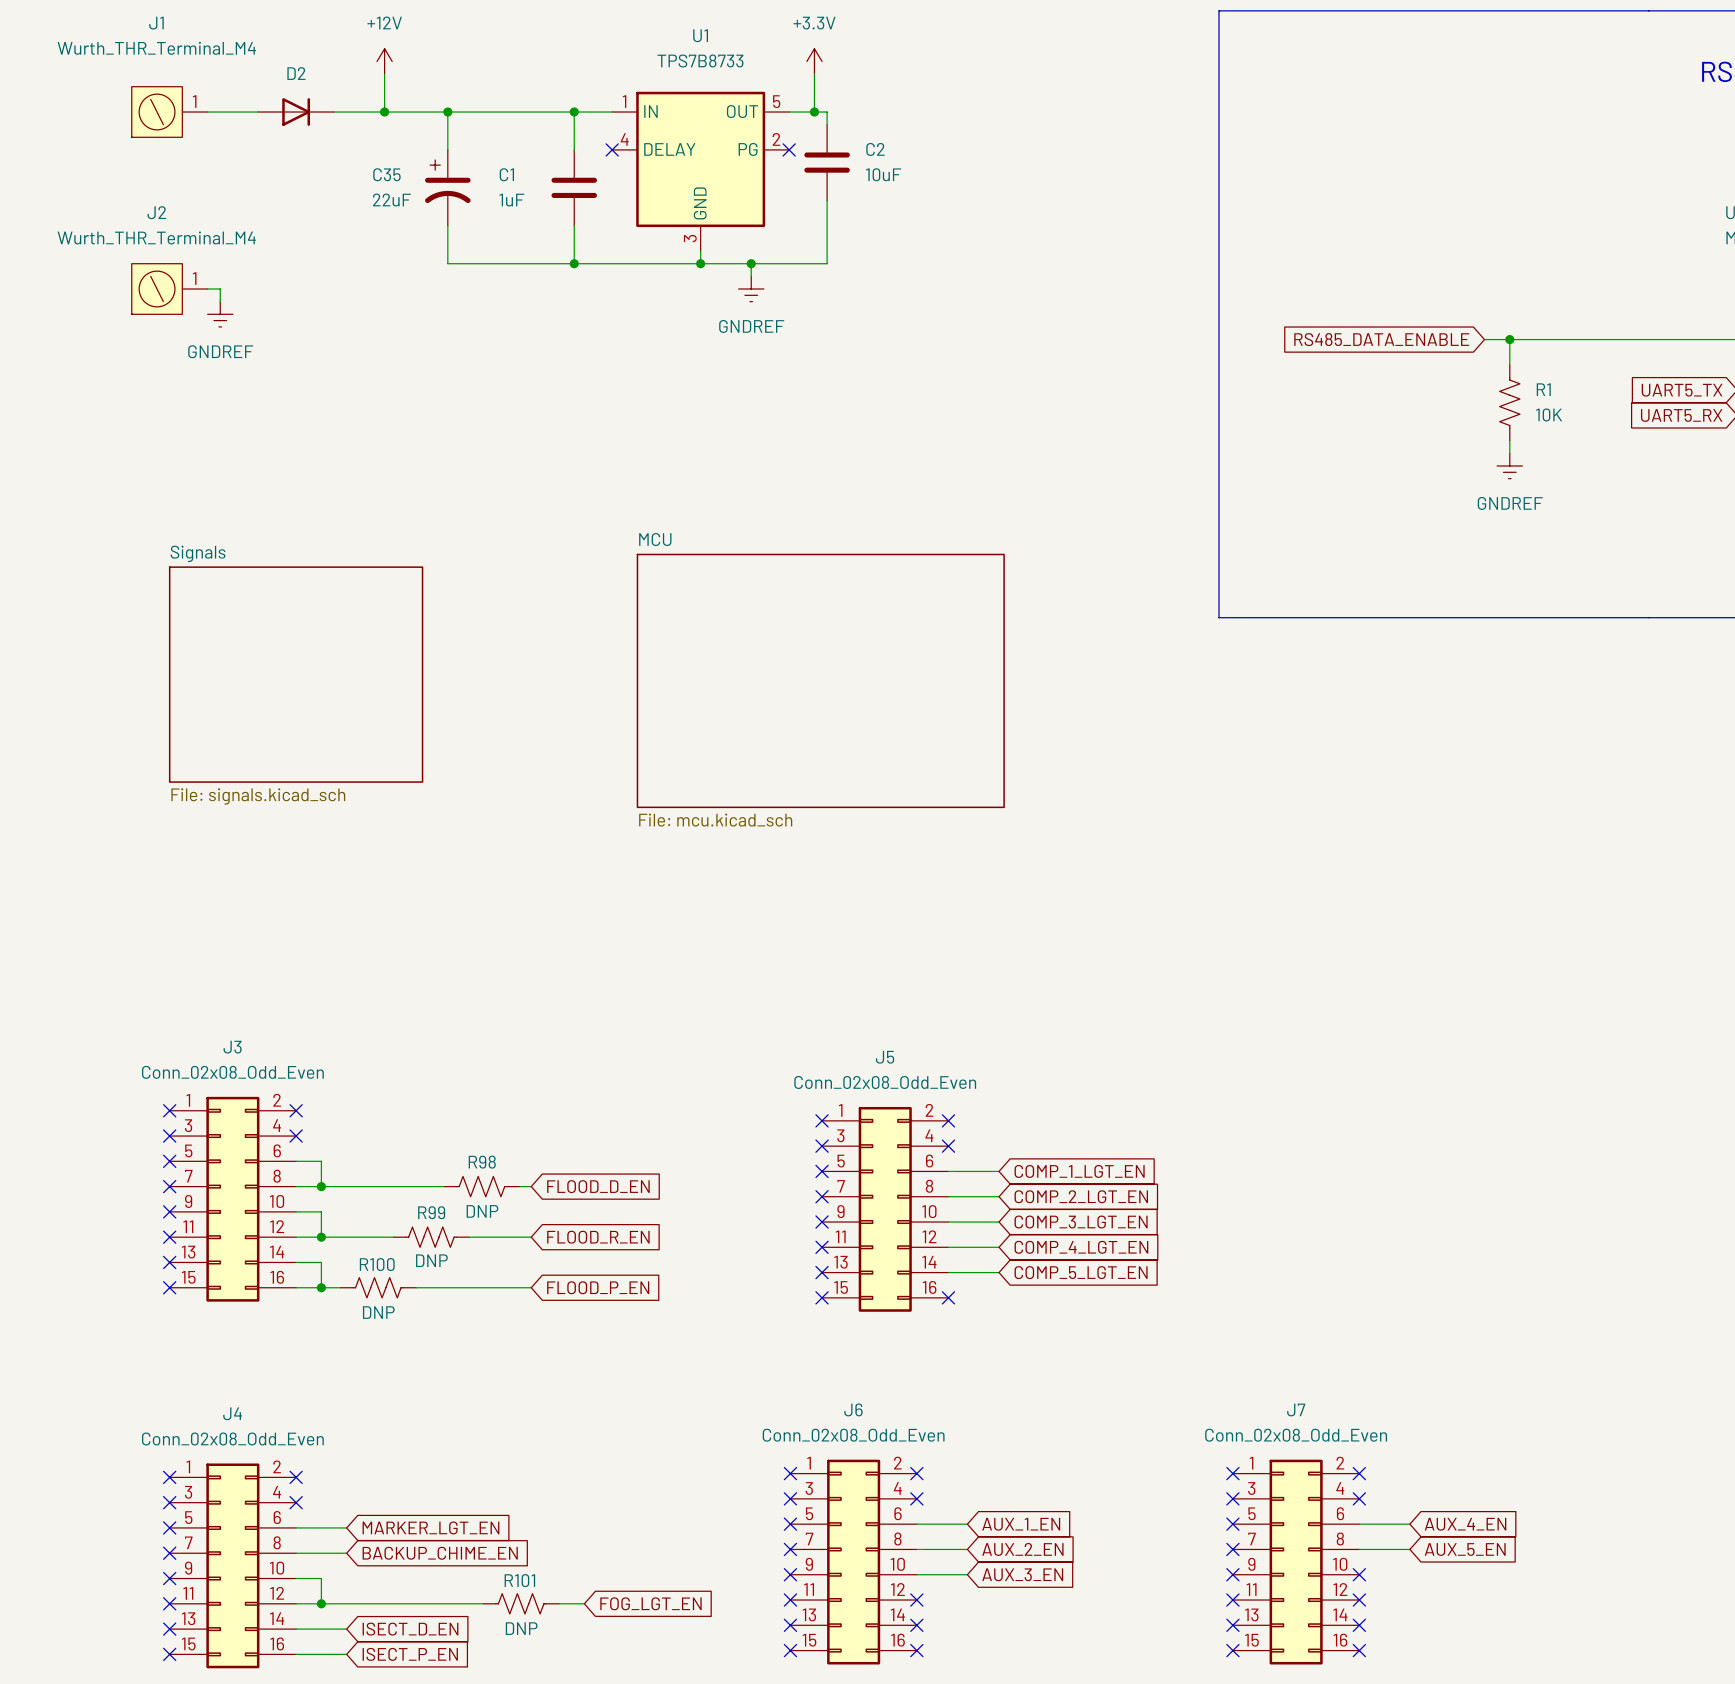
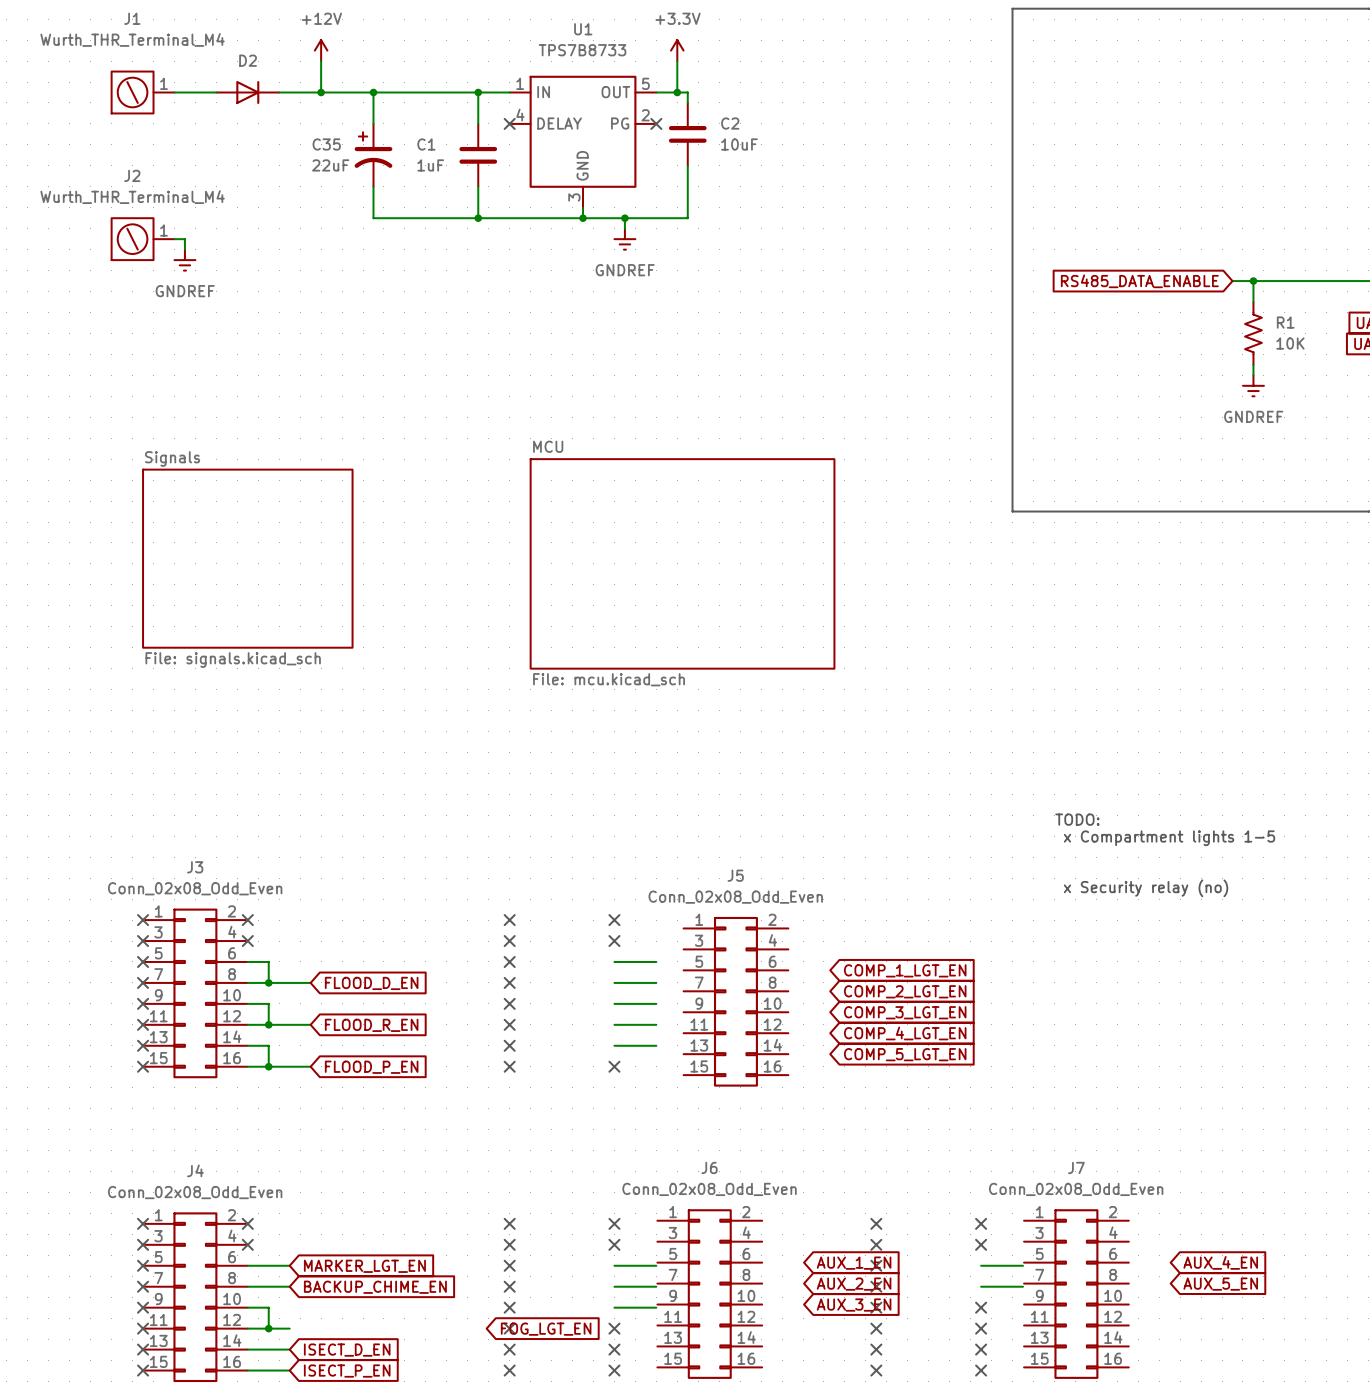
text: none -> TODO: (1077, 819)
text: none -> x Compartment lights 1-5 (1169, 838)
text: none -> x Security relay (no) (1146, 888)
no-connect mark: none -> (509, 920)
no-connect mark: none -> (614, 920)
no-connect mark: (822, 1120) -> none
no-connect mark: (948, 1120) -> none
no-connect mark: none -> (509, 941)
no-connect mark: none -> (614, 941)
no-connect mark: (822, 1146) -> none
no-connect mark: (948, 1146) -> none
no-connect mark: none -> (509, 961)
no-connect mark: (822, 1171) -> none
wire: (948, 1171) (999, 1171) -> (614, 961) (656, 961)
wire: (371, 1186) (444, 1186) -> none
R98: DNP (481, 1186) -> none
wire: (519, 1186) (531, 1186) -> none
global label position: FLOOD_D_EN (598, 1186) -> FLOOD_D_EN (371, 983)
no-connect mark: none -> (509, 982)
no-connect mark: (822, 1196) -> none
wire: (948, 1196) (999, 1196) -> (614, 982) (656, 982)
no-connect mark: none -> (509, 1003)
no-connect mark: (822, 1222) -> none
wire: (948, 1222) (999, 1222) -> (614, 1003) (656, 1003)
wire: (371, 1237) (393, 1237) -> none
R99: DNP (431, 1237) -> none
wire: (469, 1237) (531, 1237) -> none
global label position: FLOOD_R_EN (598, 1237) -> FLOOD_R_EN (371, 1025)
no-connect mark: none -> (509, 1024)
no-connect mark: (822, 1247) -> none
wire: (948, 1247) (999, 1247) -> (614, 1024) (656, 1024)
no-connect mark: none -> (509, 1045)
no-connect mark: (822, 1272) -> none
wire: (948, 1272) (999, 1272) -> (614, 1045) (656, 1045)
R100: DNP (378, 1287) -> none
wire: (416, 1287) (531, 1287) -> none
global label position: FLOOD_P_EN (598, 1287) -> FLOOD_P_EN (371, 1067)
no-connect mark: none -> (509, 1066)
no-connect mark: none -> (614, 1066)
no-connect mark: (822, 1297) -> none
no-connect mark: (948, 1297) -> none
no-connect mark: (790, 1473) -> none
no-connect mark: (916, 1473) -> none
no-connect mark: (1232, 1473) -> none
no-connect mark: (1359, 1473) -> none
no-connect mark: none -> (509, 1223)
no-connect mark: none -> (614, 1223)
no-connect mark: none -> (876, 1223)
no-connect mark: none -> (981, 1223)
no-connect mark: (790, 1498) -> none
no-connect mark: (916, 1498) -> none
no-connect mark: (1232, 1498) -> none
no-connect mark: (1359, 1498) -> none
no-connect mark: none -> (509, 1244)
no-connect mark: none -> (614, 1244)
no-connect mark: none -> (876, 1244)
no-connect mark: none -> (981, 1244)
no-connect mark: (790, 1524) -> none
wire: (916, 1524) (967, 1524) -> (614, 1265) (656, 1265)
no-connect mark: (1232, 1524) -> none
wire: (1359, 1524) (1409, 1524) -> (981, 1265) (1022, 1265)
no-connect mark: none -> (509, 1265)
no-connect mark: none -> (876, 1265)
no-connect mark: (790, 1549) -> none
wire: (916, 1549) (967, 1549) -> (614, 1286) (656, 1286)
no-connect mark: (1232, 1549) -> none
wire: (1359, 1549) (1409, 1549) -> (981, 1286) (1022, 1286)
no-connect mark: none -> (509, 1286)
no-connect mark: none -> (876, 1286)
no-connect mark: (790, 1574) -> none
wire: (916, 1574) (967, 1574) -> (614, 1307) (656, 1307)
no-connect mark: (1232, 1574) -> none
no-connect mark: (1359, 1574) -> none
no-connect mark: none -> (509, 1307)
no-connect mark: none -> (876, 1307)
no-connect mark: none -> (981, 1307)
no-connect mark: (790, 1600) -> none
no-connect mark: (916, 1600) -> none
no-connect mark: (1232, 1600) -> none
no-connect mark: (1359, 1600) -> none
wire: (346, 1603) (483, 1603) -> none
R101: DNP (521, 1603) -> none
wire: (559, 1603) (584, 1603) -> none
no-connect mark: none -> (509, 1328)
no-connect mark: none -> (614, 1328)
no-connect mark: none -> (876, 1328)
no-connect mark: none -> (981, 1328)
no-connect mark: (790, 1625) -> none
no-connect mark: (916, 1625) -> none
no-connect mark: (1232, 1625) -> none
no-connect mark: (1359, 1625) -> none
no-connect mark: none -> (509, 1349)
no-connect mark: none -> (614, 1349)
no-connect mark: none -> (876, 1349)
no-connect mark: none -> (981, 1349)
no-connect mark: (790, 1650) -> none
no-connect mark: (916, 1650) -> none
no-connect mark: (1232, 1650) -> none
no-connect mark: (1359, 1650) -> none
no-connect mark: none -> (509, 1370)
no-connect mark: none -> (614, 1370)
no-connect mark: none -> (876, 1370)
no-connect mark: none -> (981, 1370)

